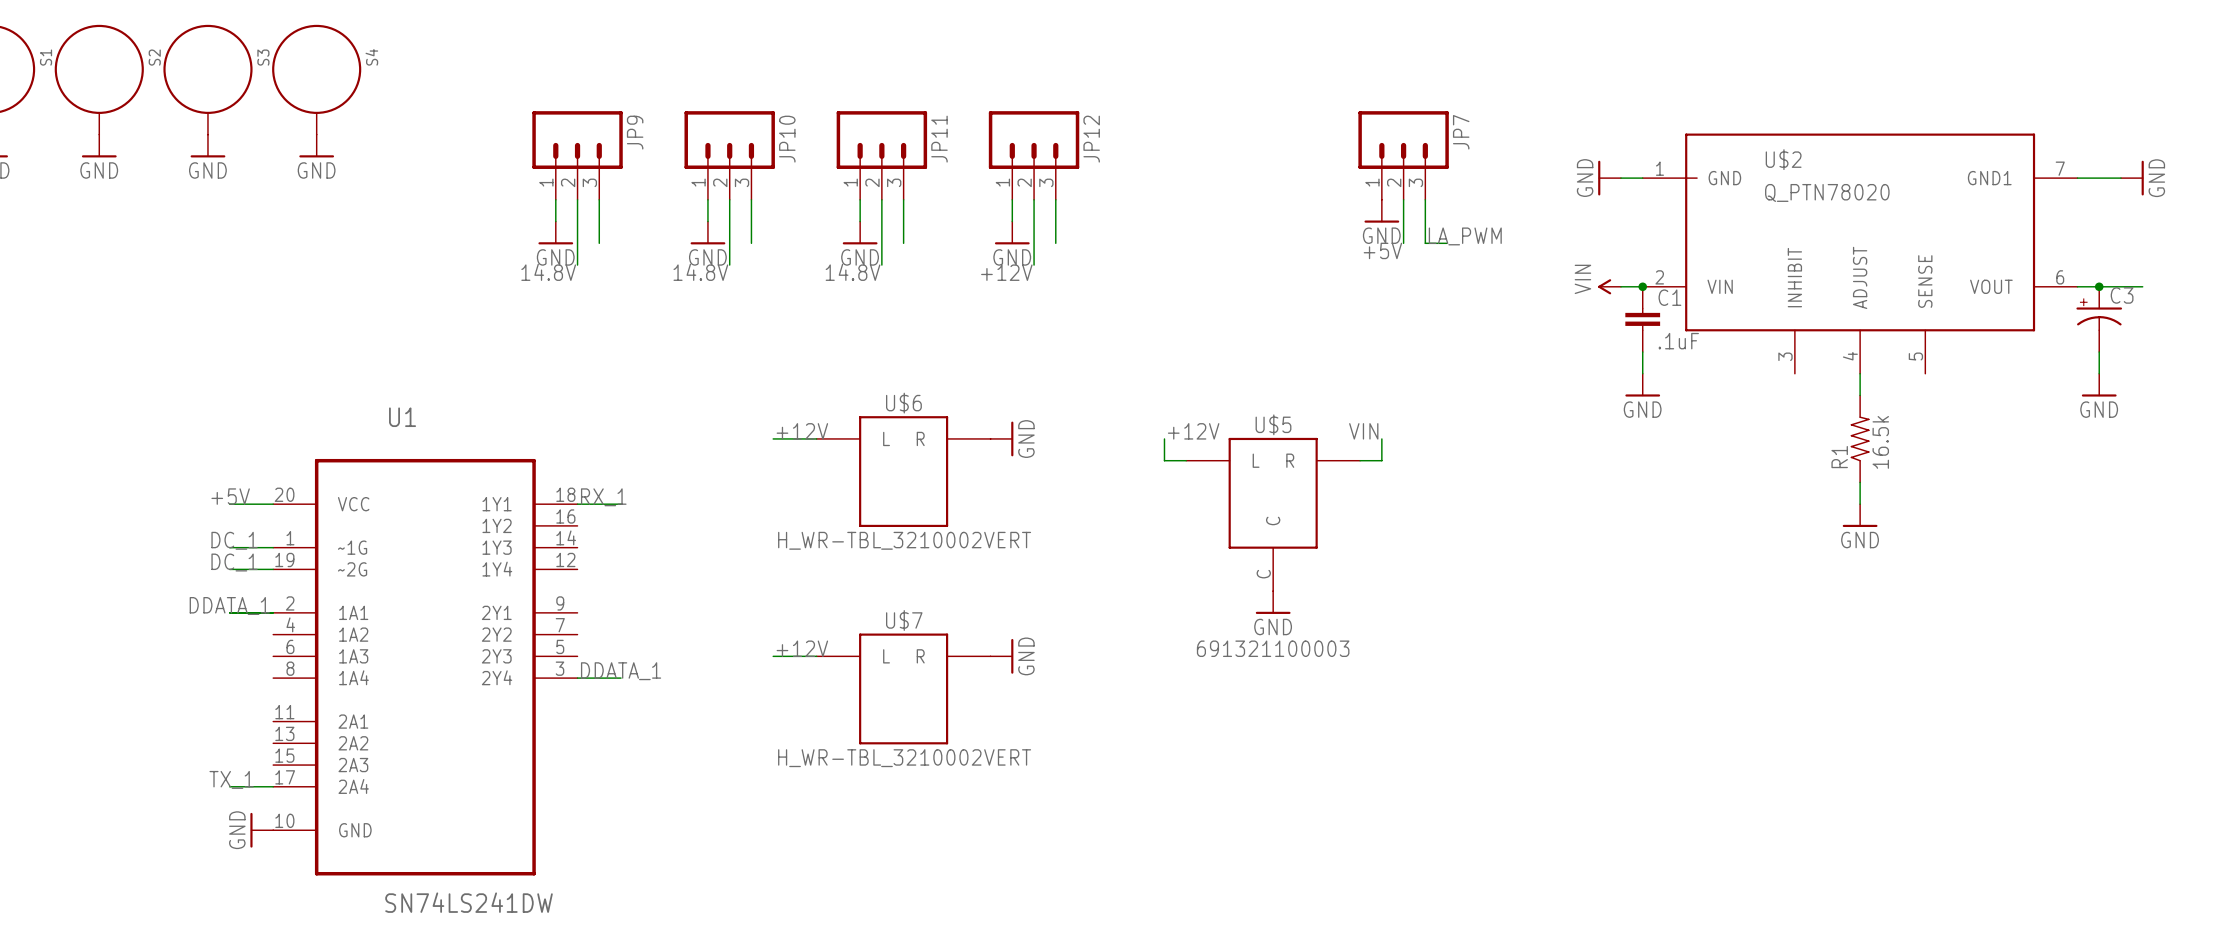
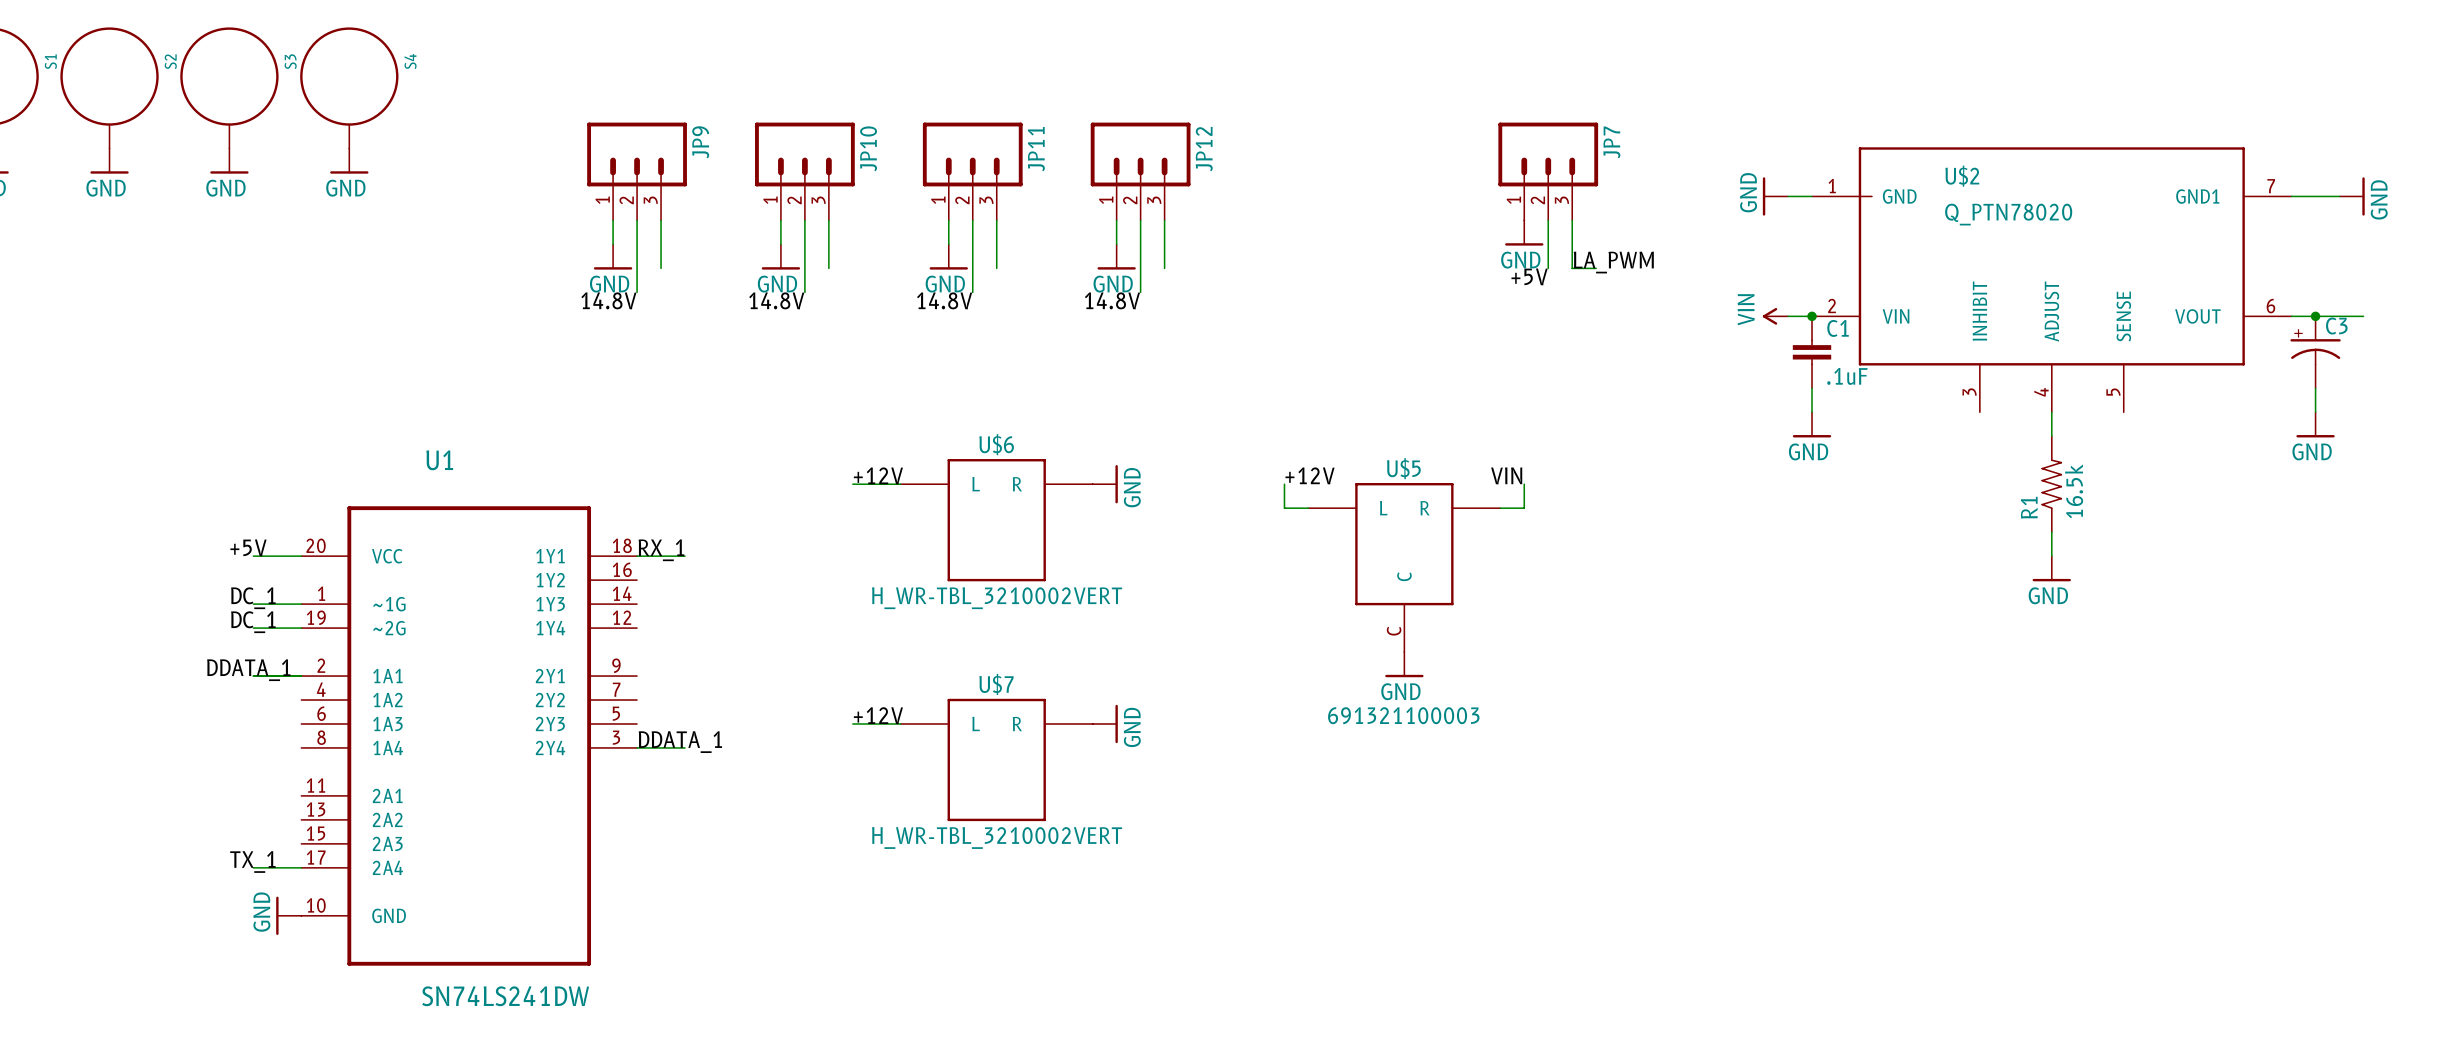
label: +12V (1006, 272) -> 14.8V (1112, 300)

